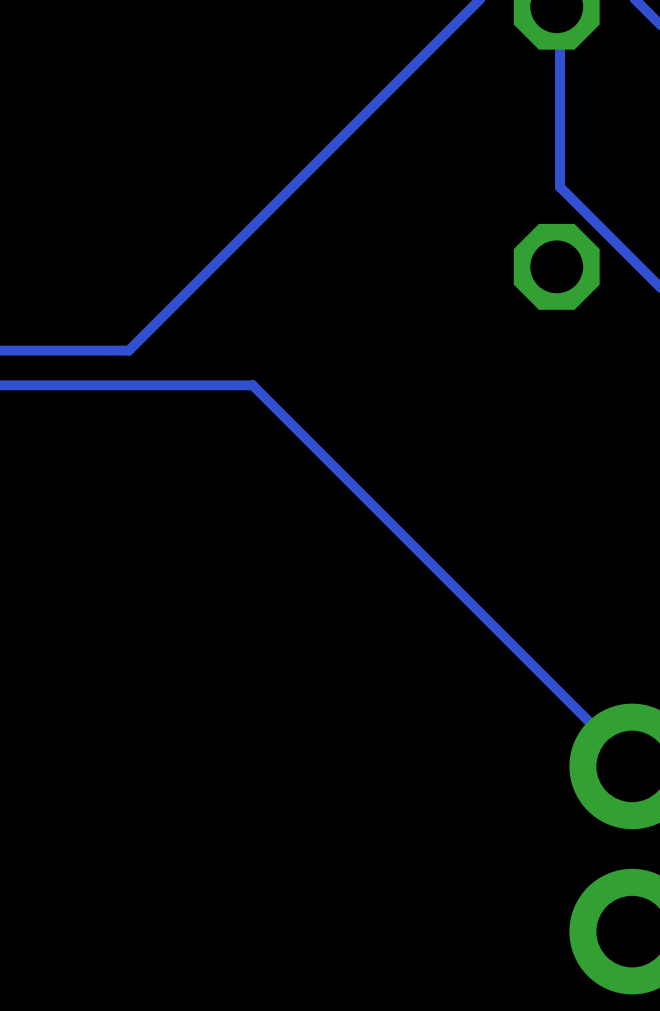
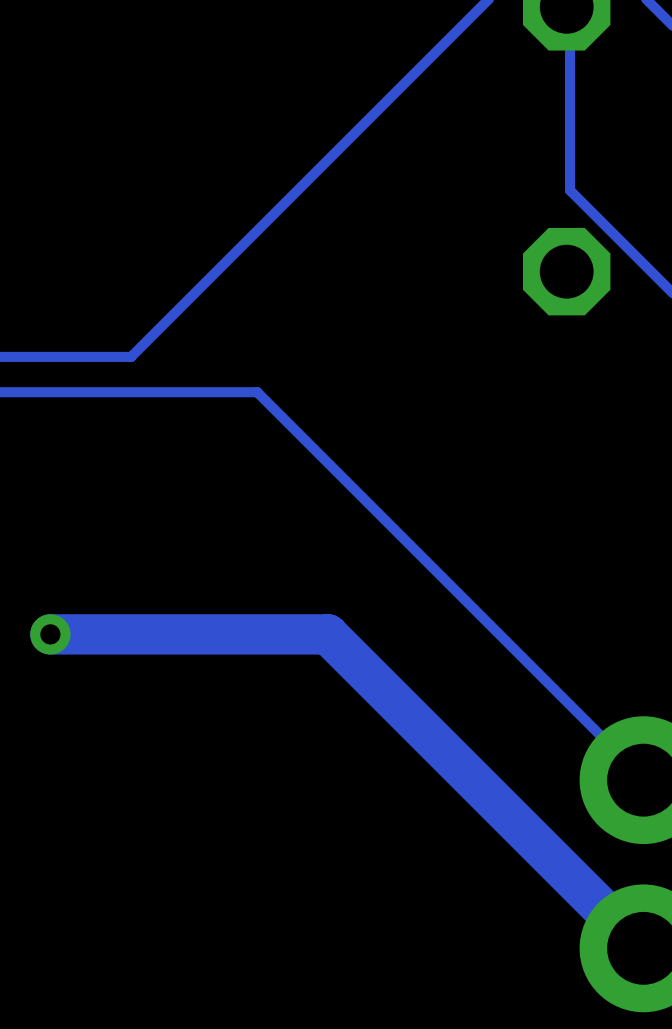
track: none -> (50, 634) (327, 634) (643, 948)
via: none -> (50, 634)

